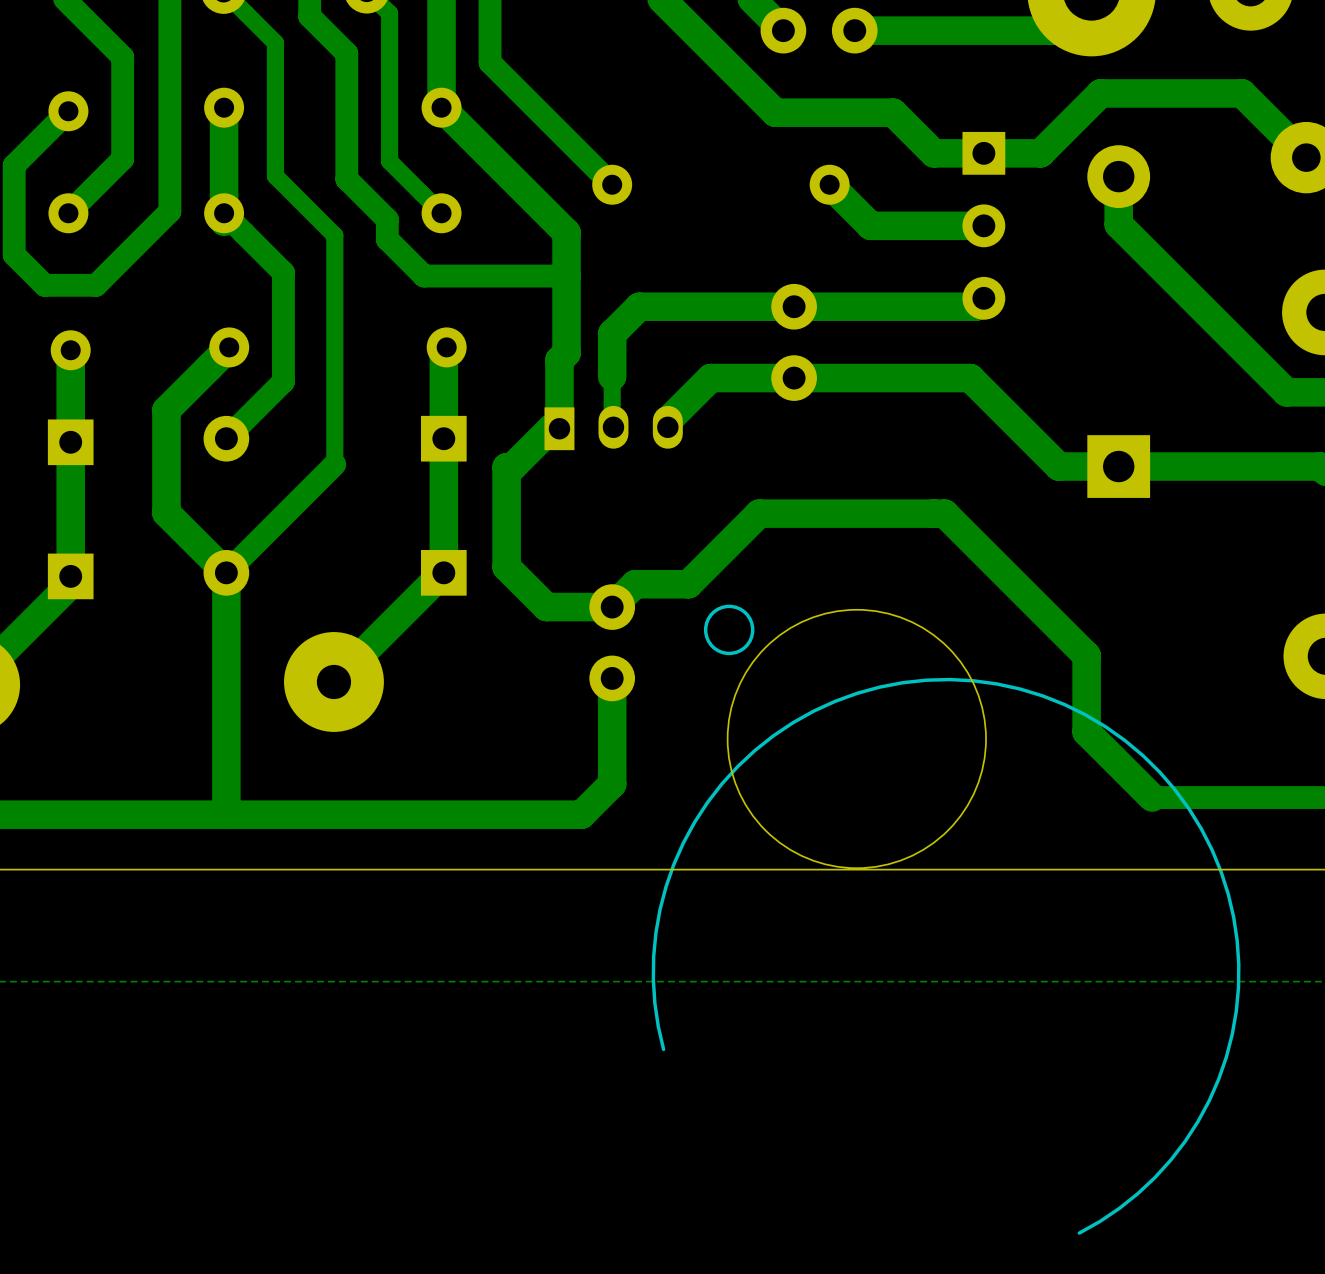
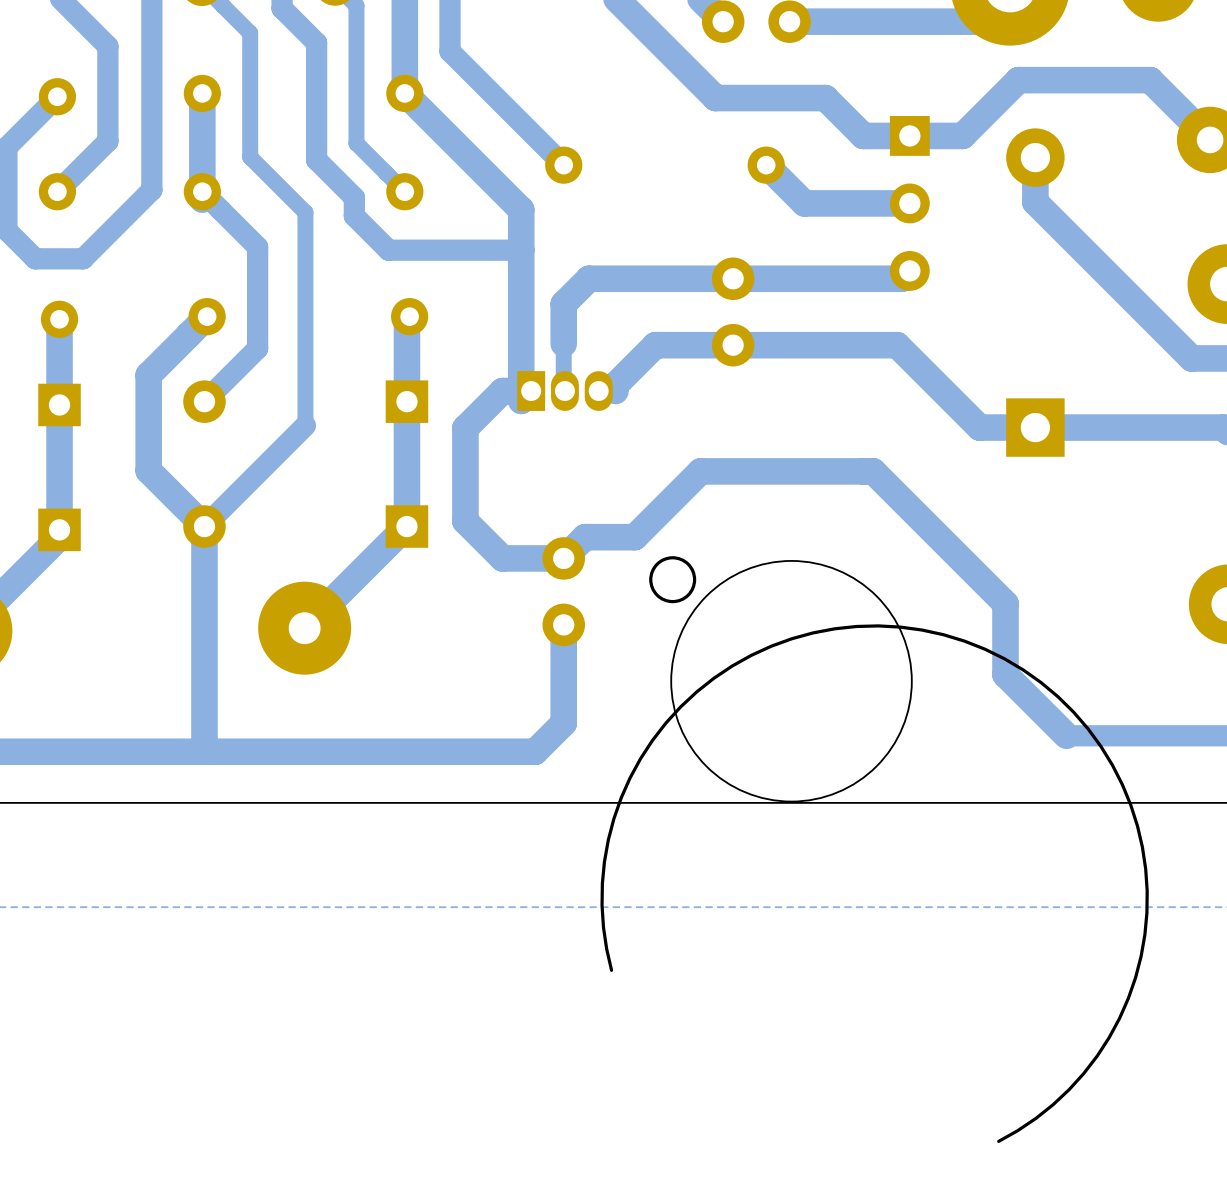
track: (566, 353) (559, 360) (559, 428) (550, 428) (512, 467) (506, 467) -> (521, 321) (521, 400)
part footprint: [544, 405, 683, 451] -> [517, 371, 613, 411]
track: none -> (521, 391) (502, 391) (465, 428)

